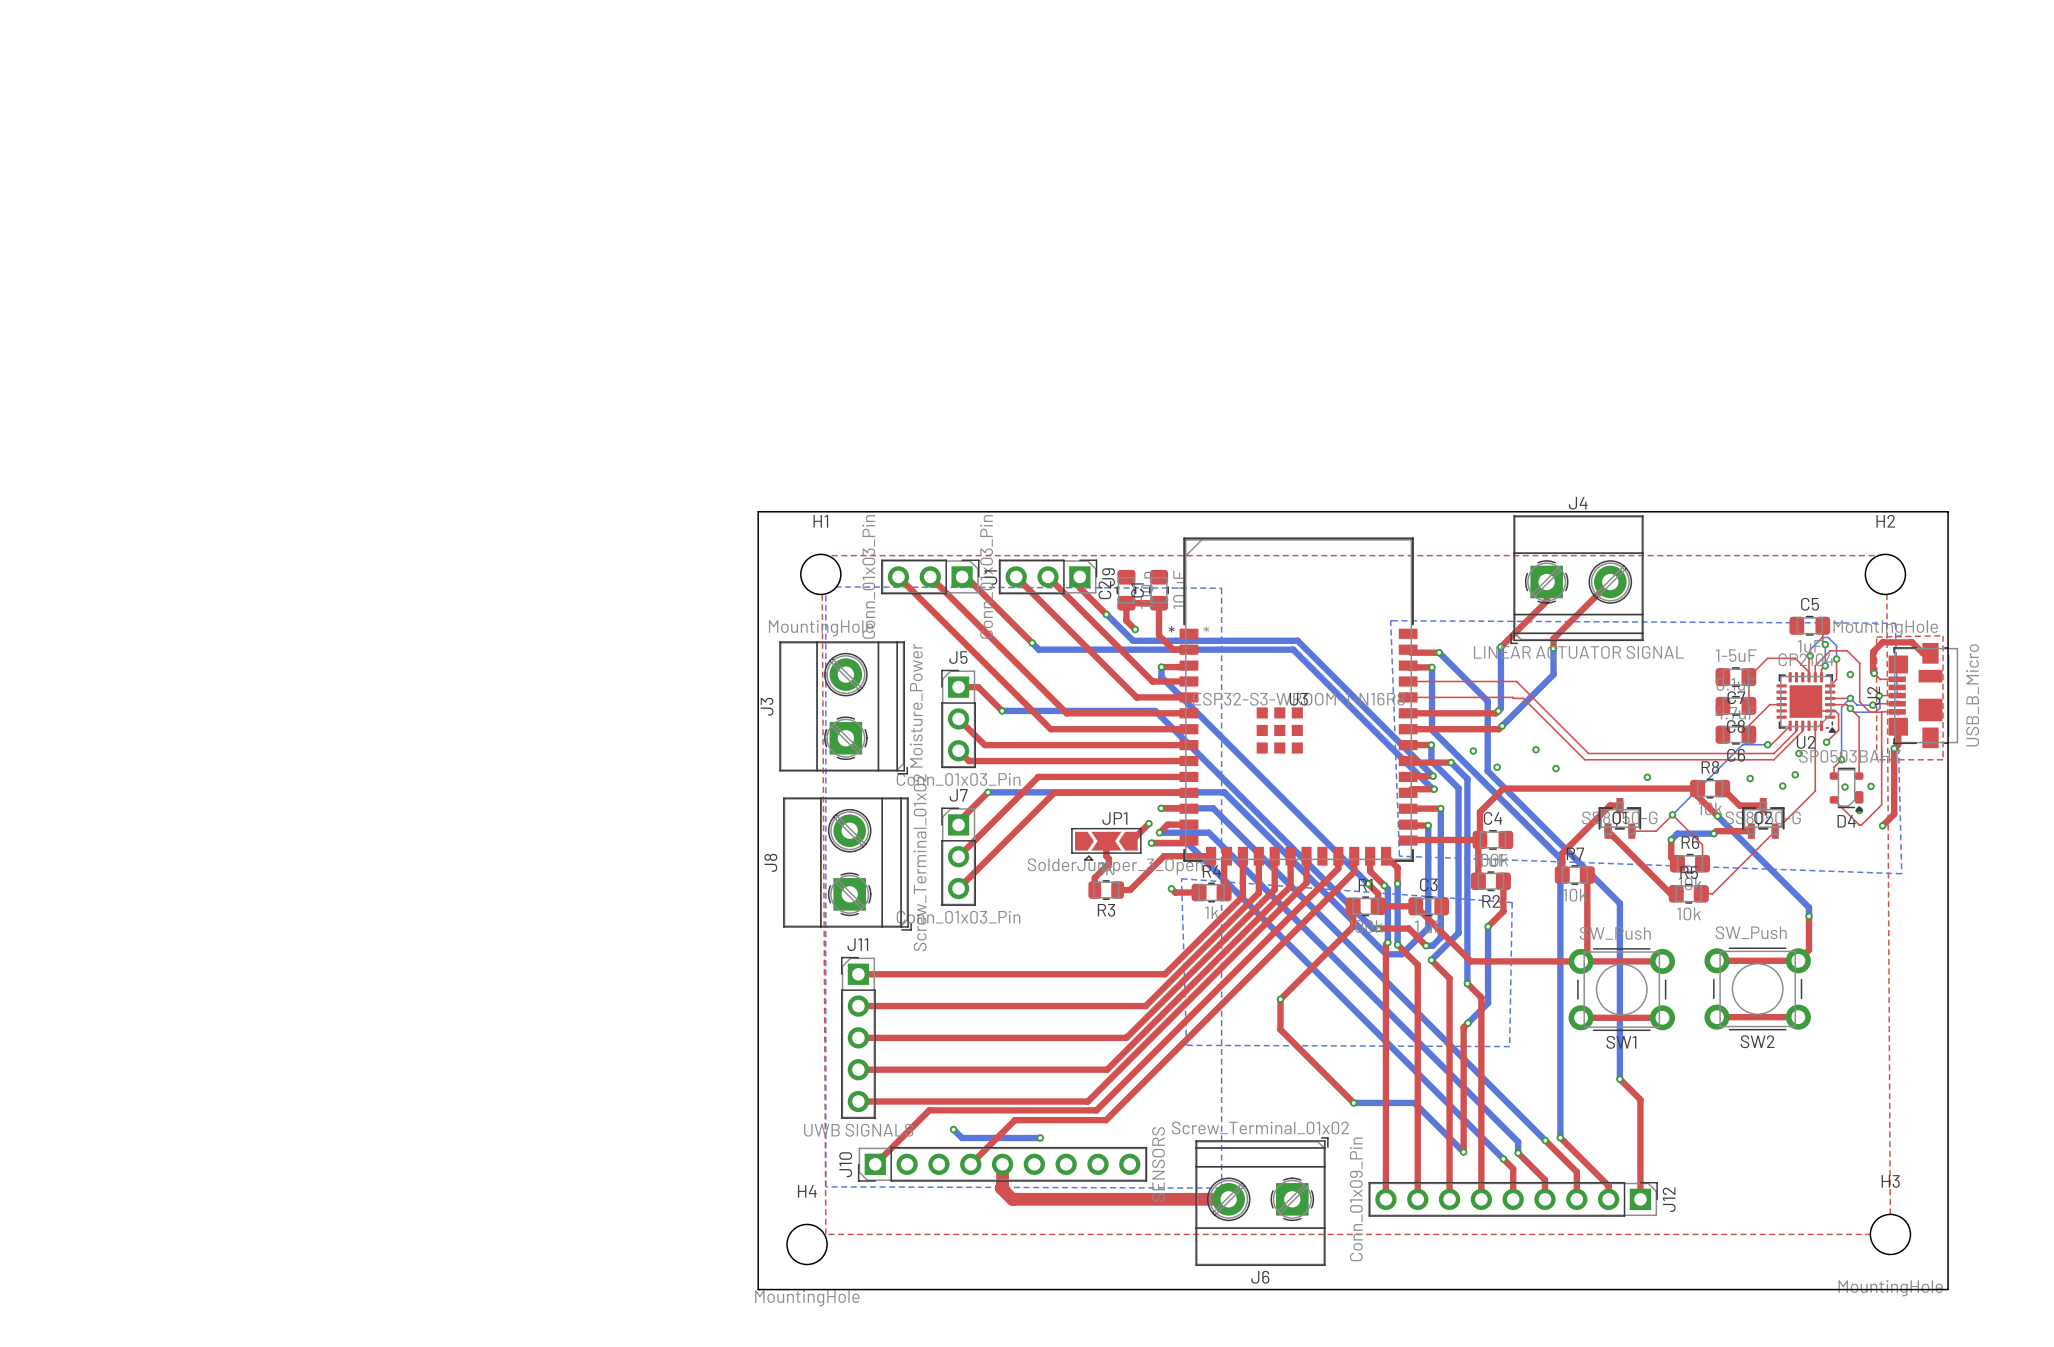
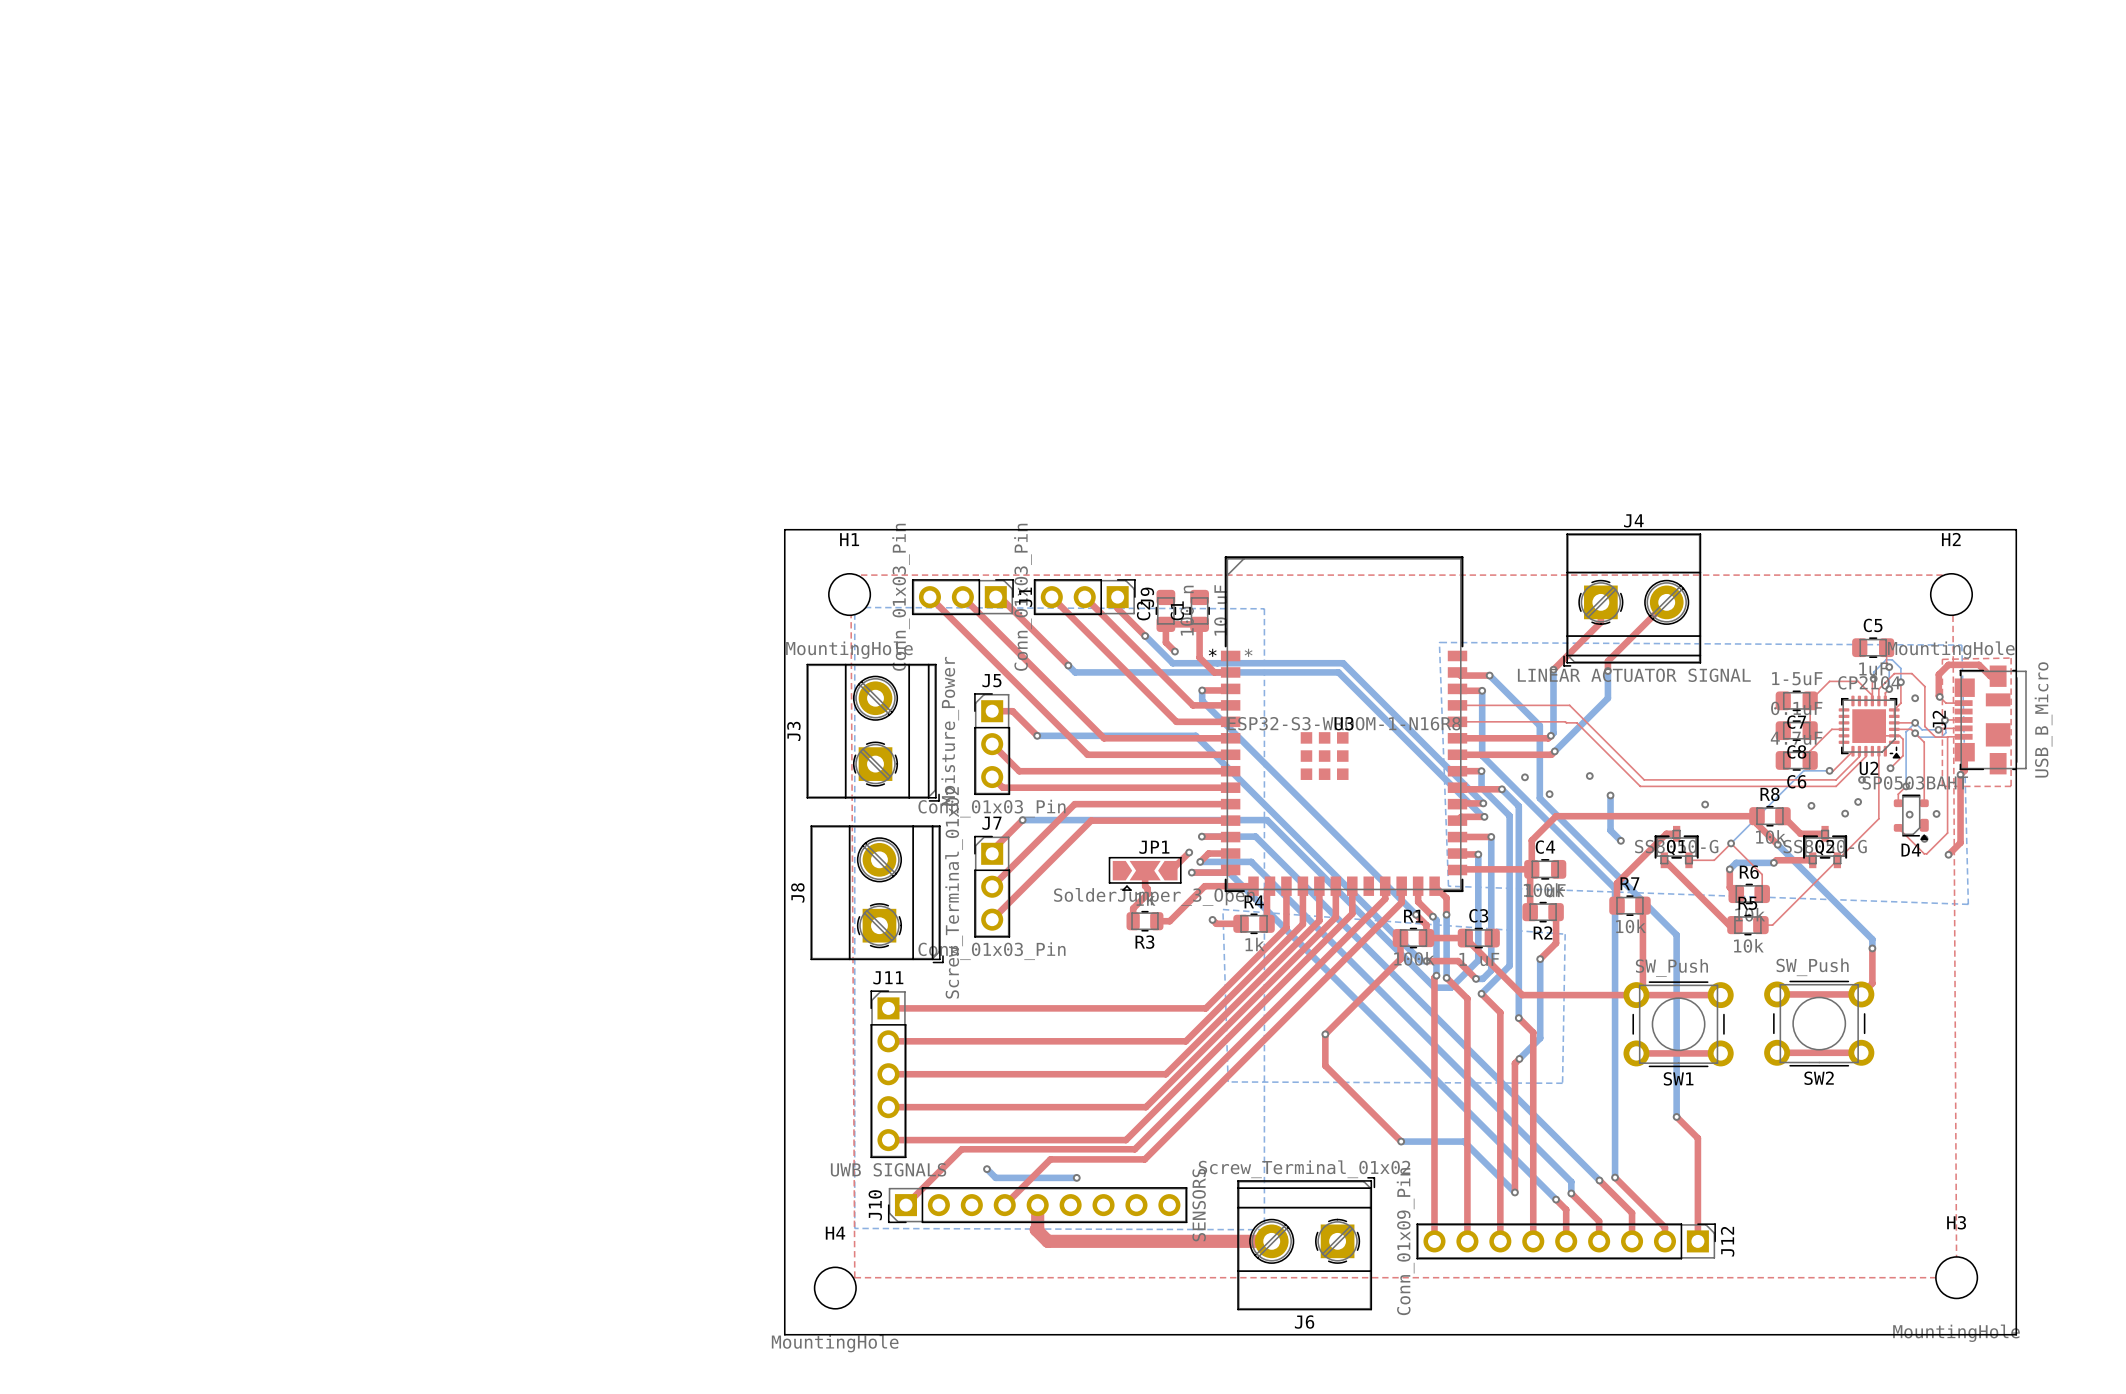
bottom track: none -> (1610, 795) (1610, 830) (1620, 840)
via: none -> (1620, 840)

